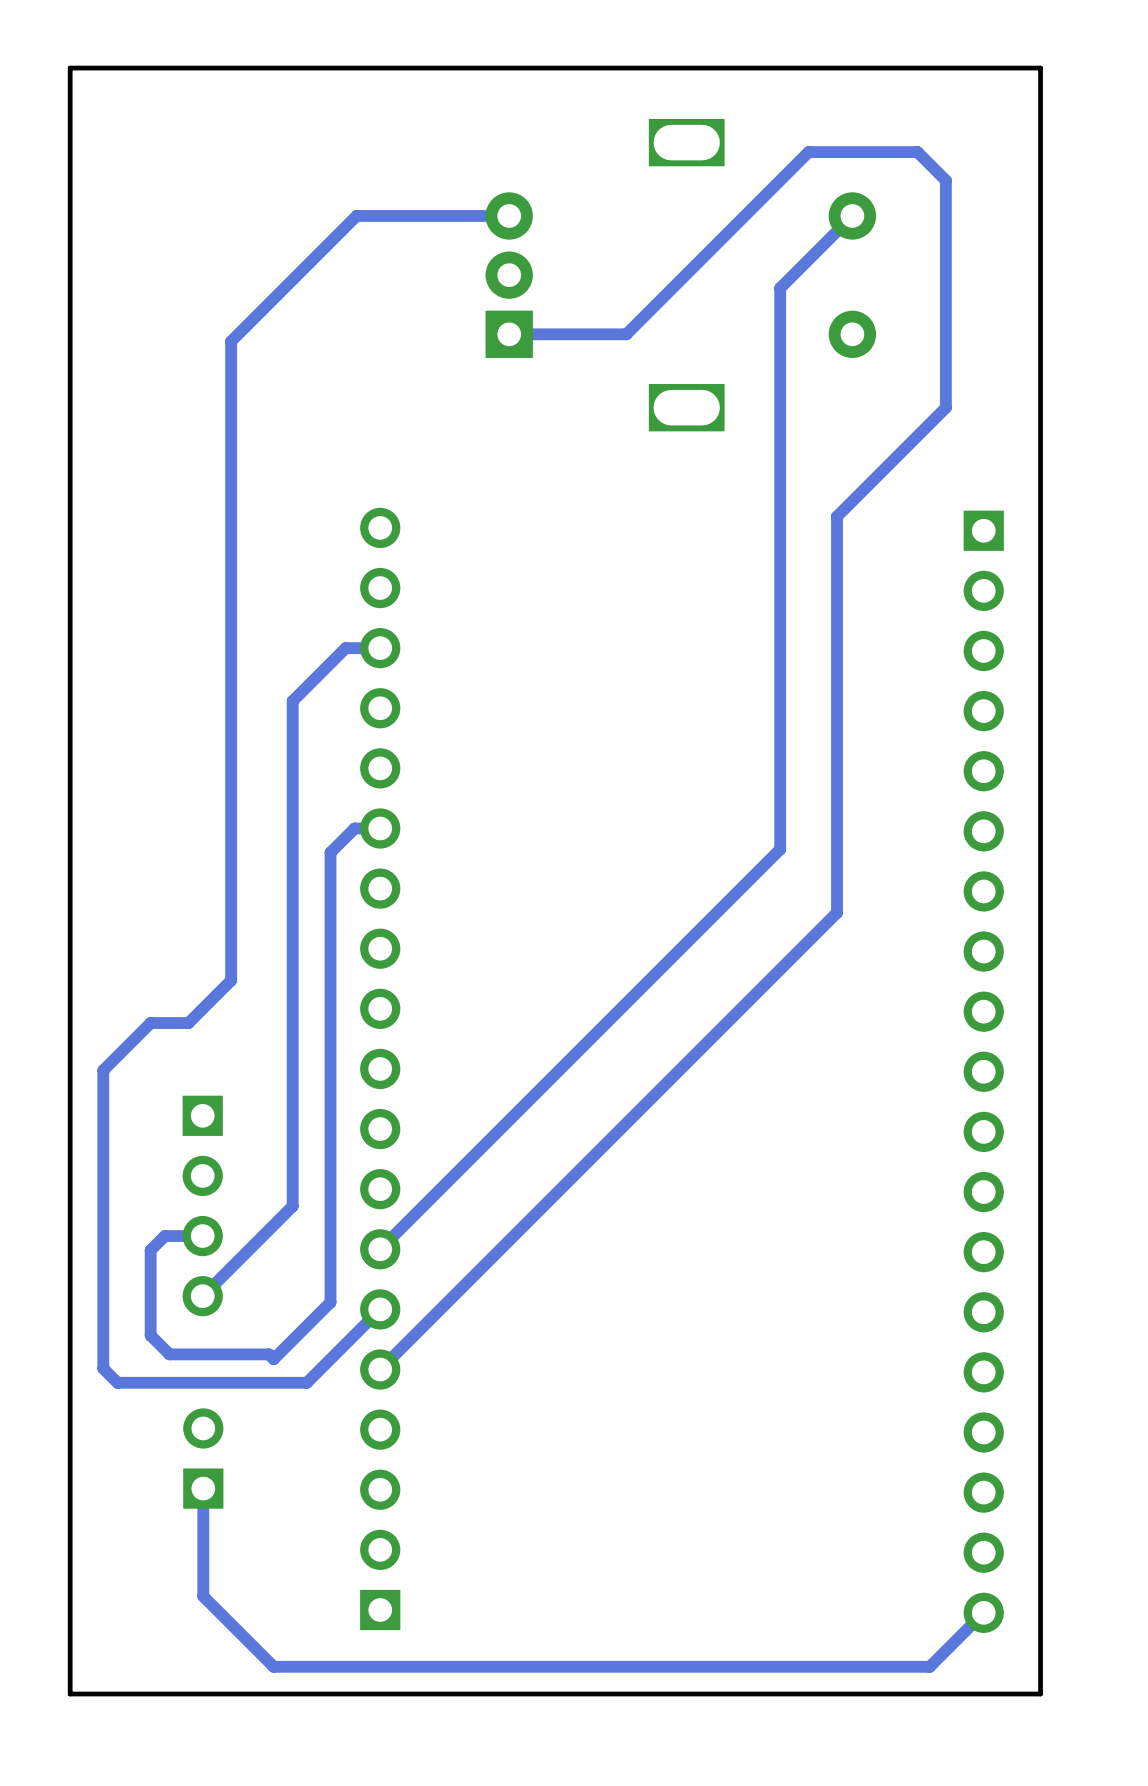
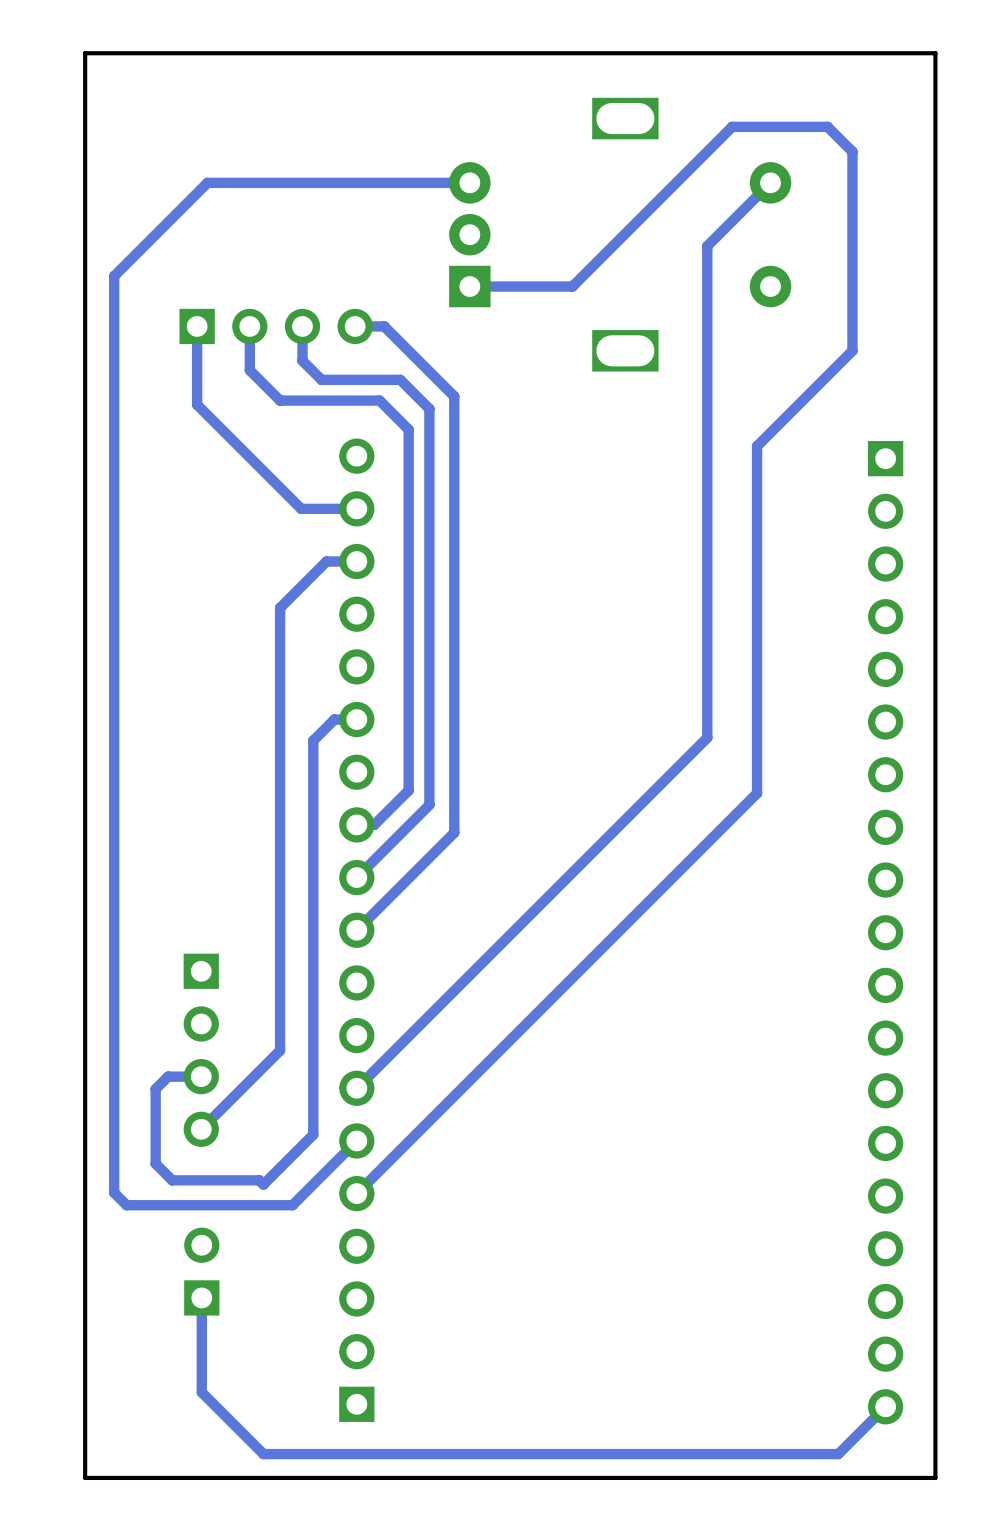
track: (356, 215) (231, 341) (231, 980) (188, 1023) (150, 1023) (103, 1070) -> (336, 182) (207, 182) (114, 276) (114, 931)
track: none -> (197, 326) (197, 404) (301, 508) (356, 508)
track: none -> (249, 326) (249, 370) (280, 400) (379, 400) (408, 429) (408, 790) (374, 824) (356, 824)
part: none -> (276, 326)
track: none -> (302, 326) (302, 360) (321, 379) (400, 379) (429, 408) (429, 804) (356, 877)
track: none -> (355, 326) (384, 326) (454, 396) (454, 832) (356, 930)

